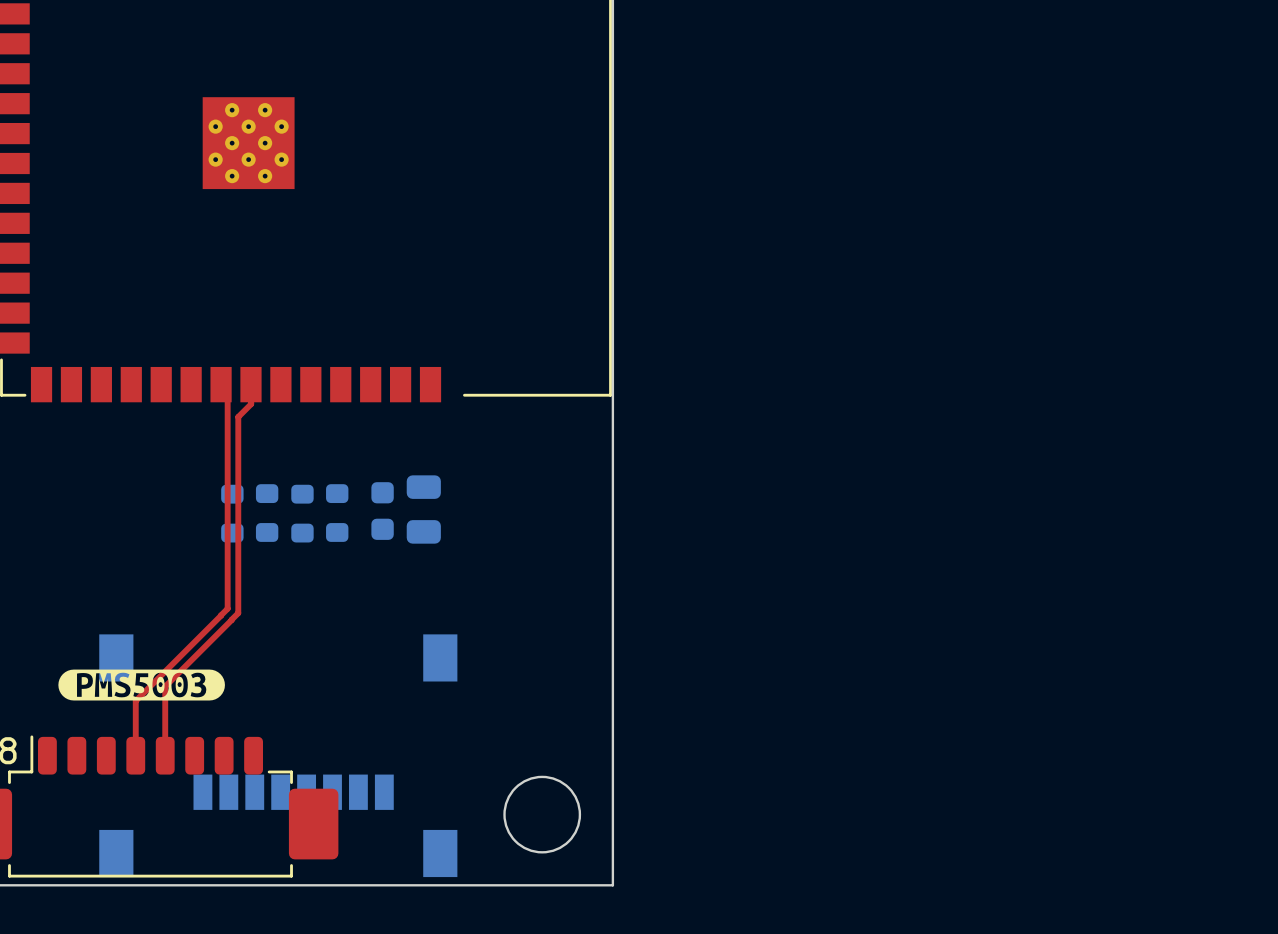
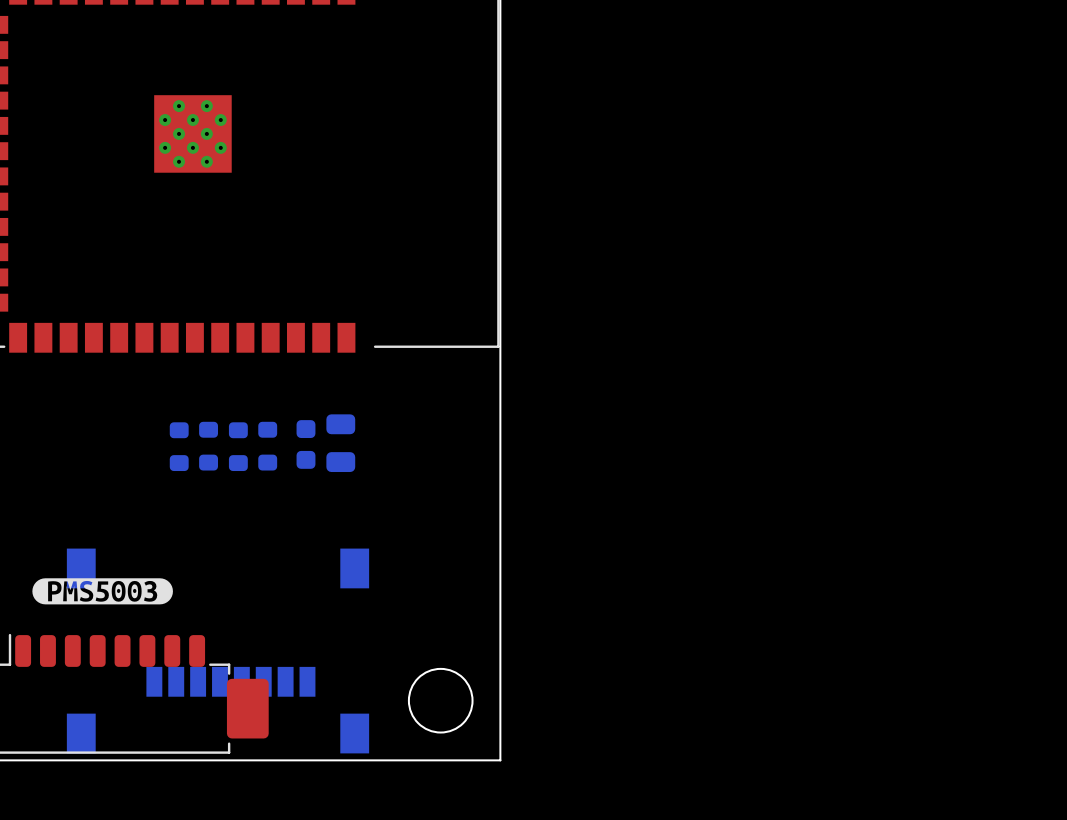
top track: (221, 384) (227, 391) (227, 608) (221, 615) -> none
top track: (251, 384) (251, 404) (238, 417) (238, 613) (231, 619) -> none
top track: (221, 615) (135, 700) (135, 755) -> none
top track: (231, 620) (165, 686) (165, 755) -> none

